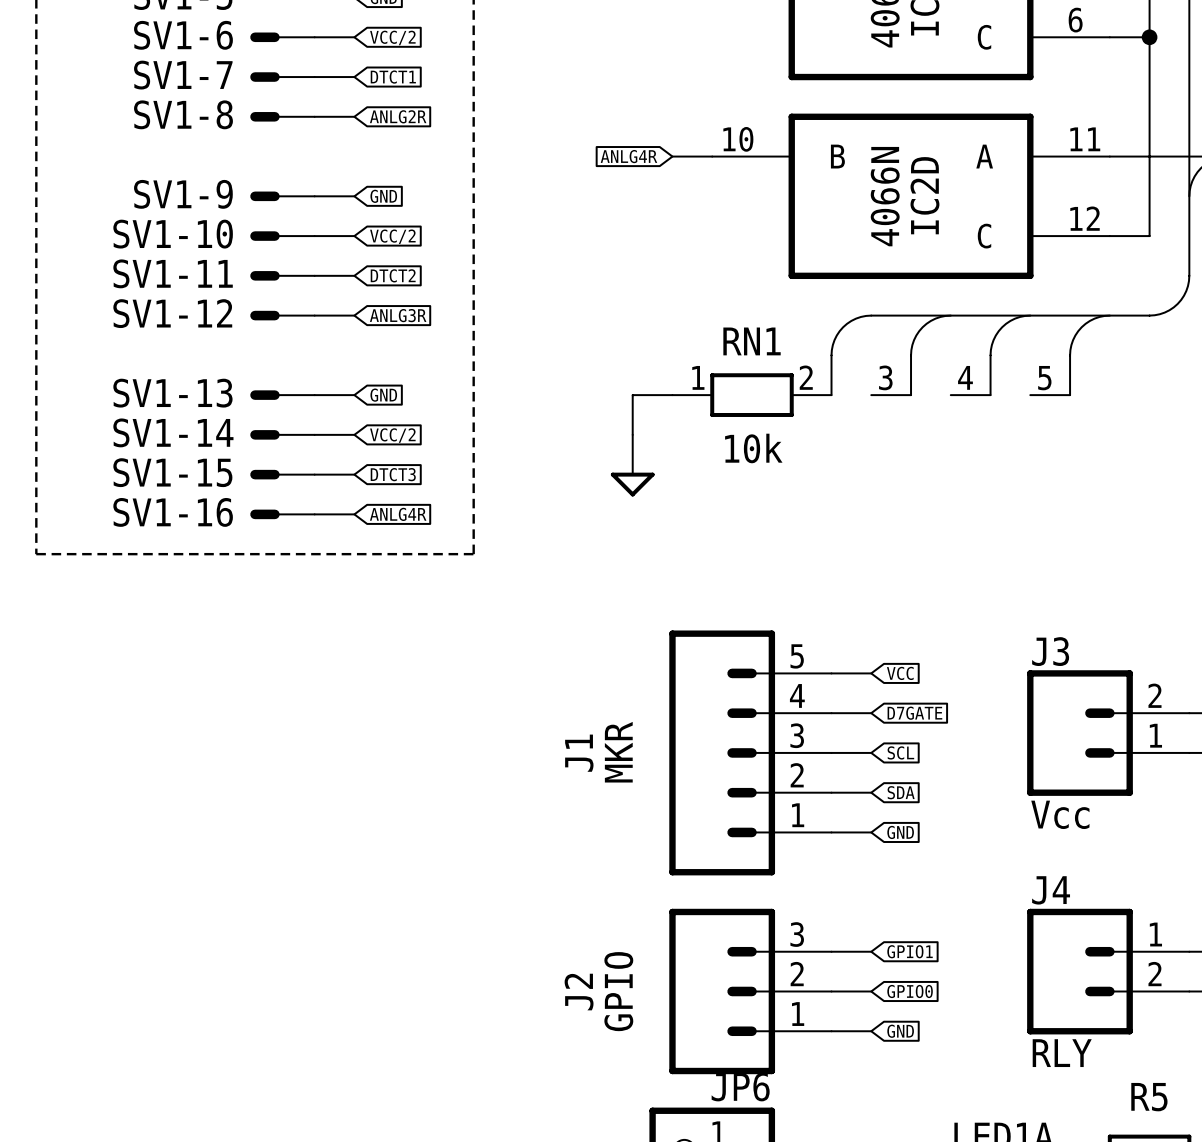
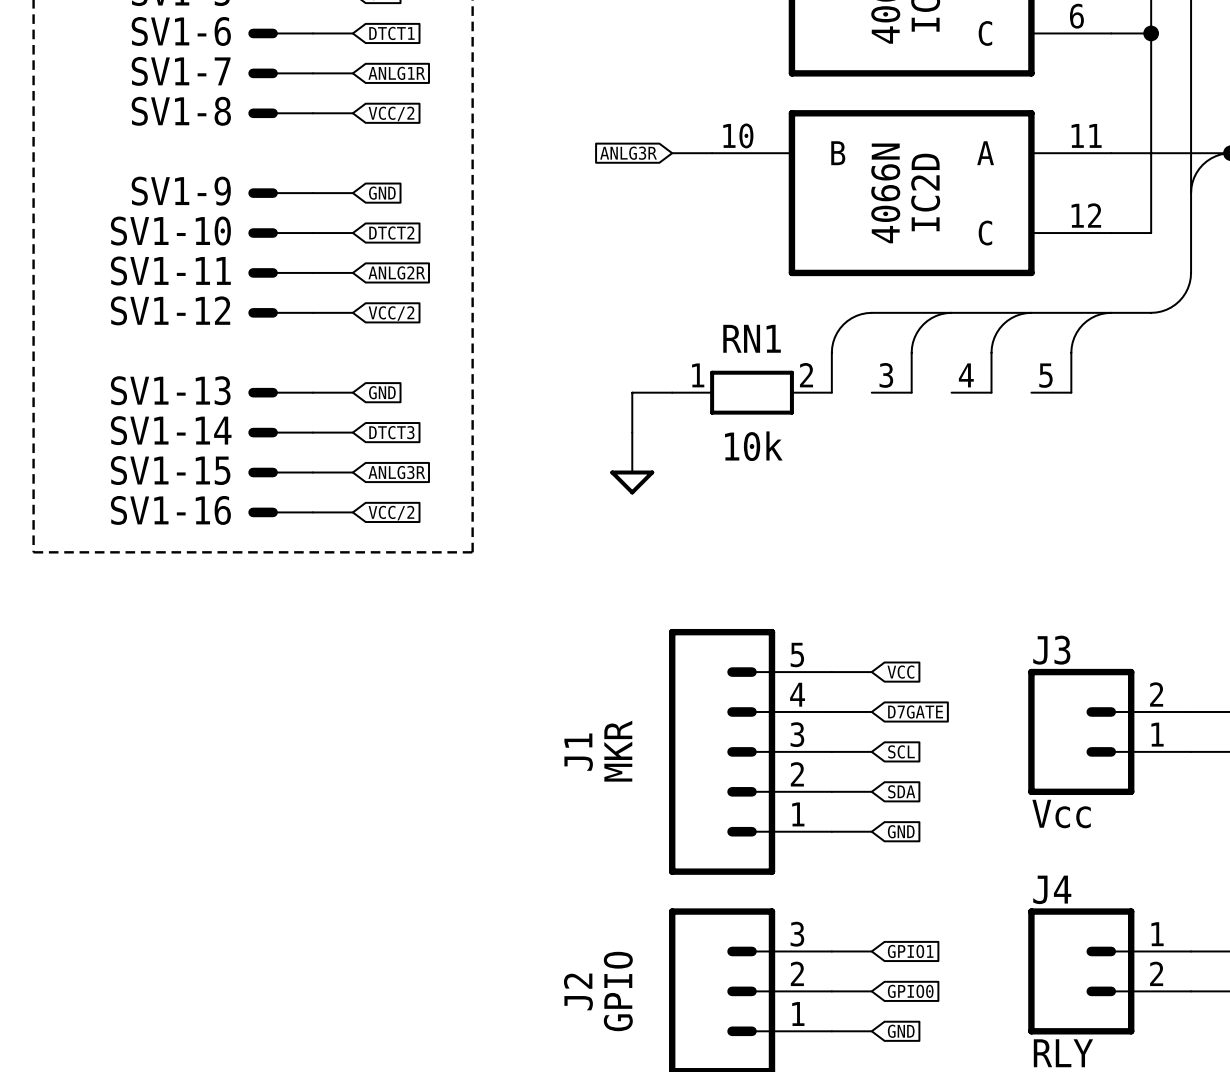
global label: VCC/2 (392, 37) -> DTCT1 (391, 33)
global label: DTCT1 (393, 77) -> ANLG1R (396, 73)
global label: ANLG2R (398, 116) -> VCC/2 (391, 113)
global label: ANLG4R (628, 156) -> ANLG3R (628, 153)
global label: VCC/2 (392, 236) -> DTCT2 (391, 233)
global label: DTCT2 (393, 275) -> ANLG2R (396, 272)
global label: ANLG3R (398, 315) -> VCC/2 (391, 313)
global label: VCC/2 (392, 435) -> DTCT3 (391, 432)
global label: DTCT3 (393, 474) -> ANLG3R (396, 472)
global label: ANLG4R (398, 514) -> VCC/2 (391, 513)

